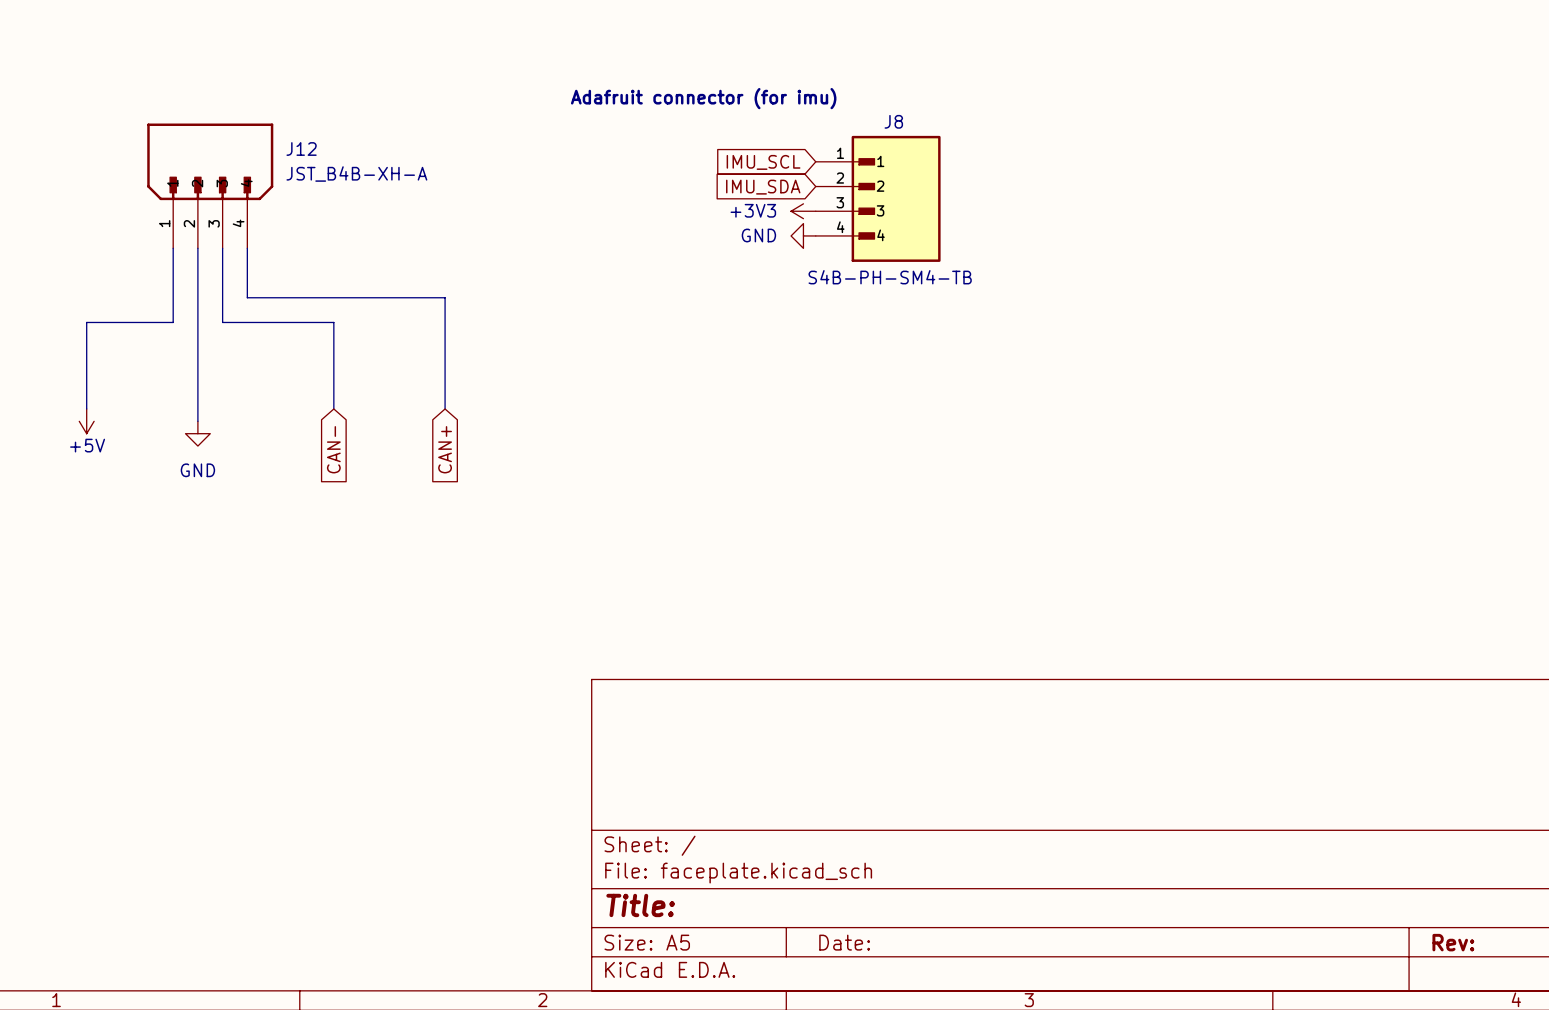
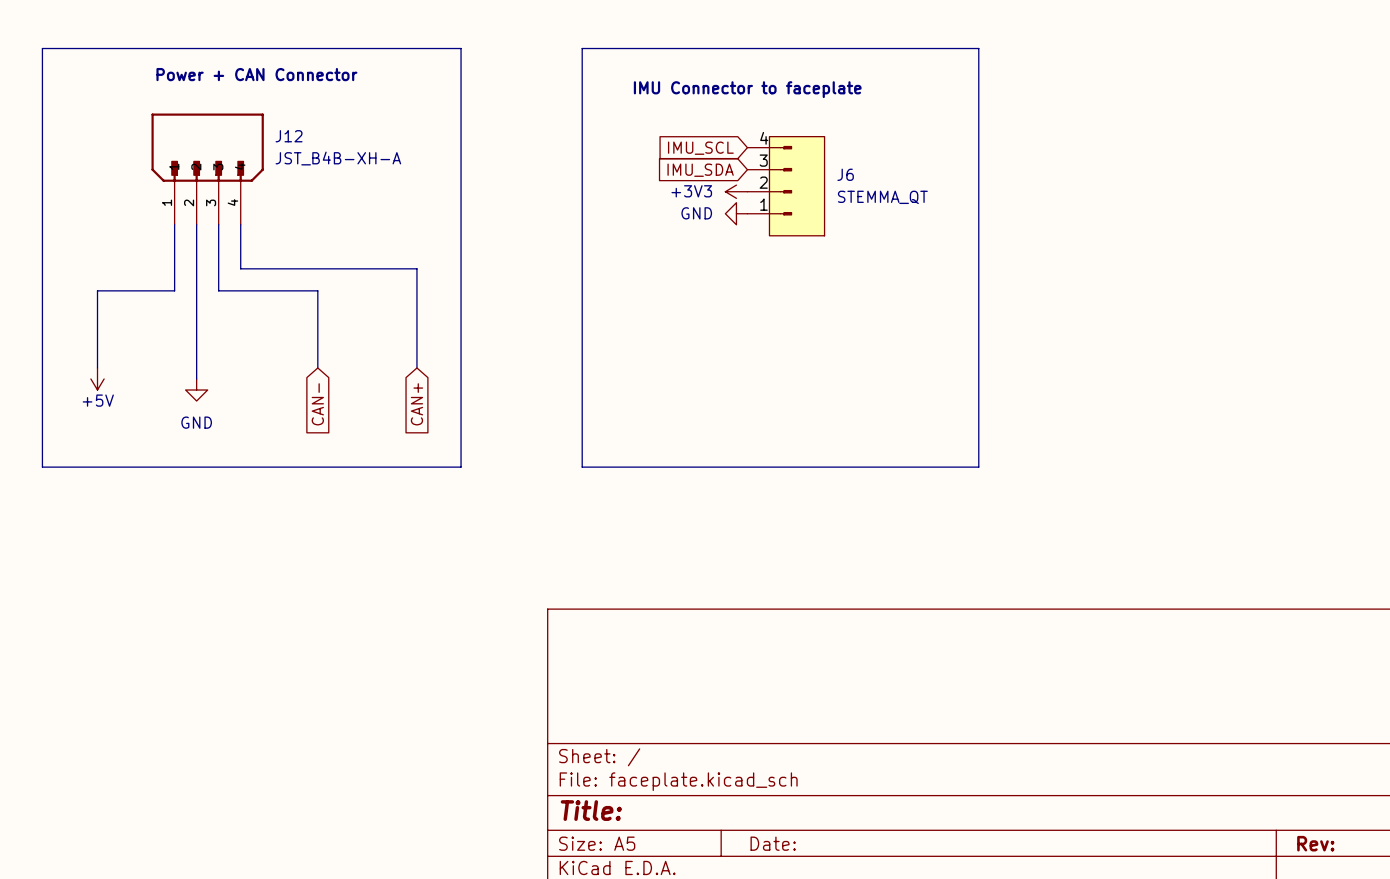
line: none -> (42, 48) (461, 48) (461, 467) (42, 467) (42, 48)
line: none -> (582, 48) (978, 48) (978, 467) (582, 467) (582, 48)
text: none -> Power + CAN Connector (256, 74)
text: none -> IMU Connector to faceplate (747, 89)
text: Adafruit connector (for imu) (703, 98) -> none
J8: S4B-PH-SM4-TB (878, 198) -> none
J6: none -> STEMMA_QT (786, 186)

